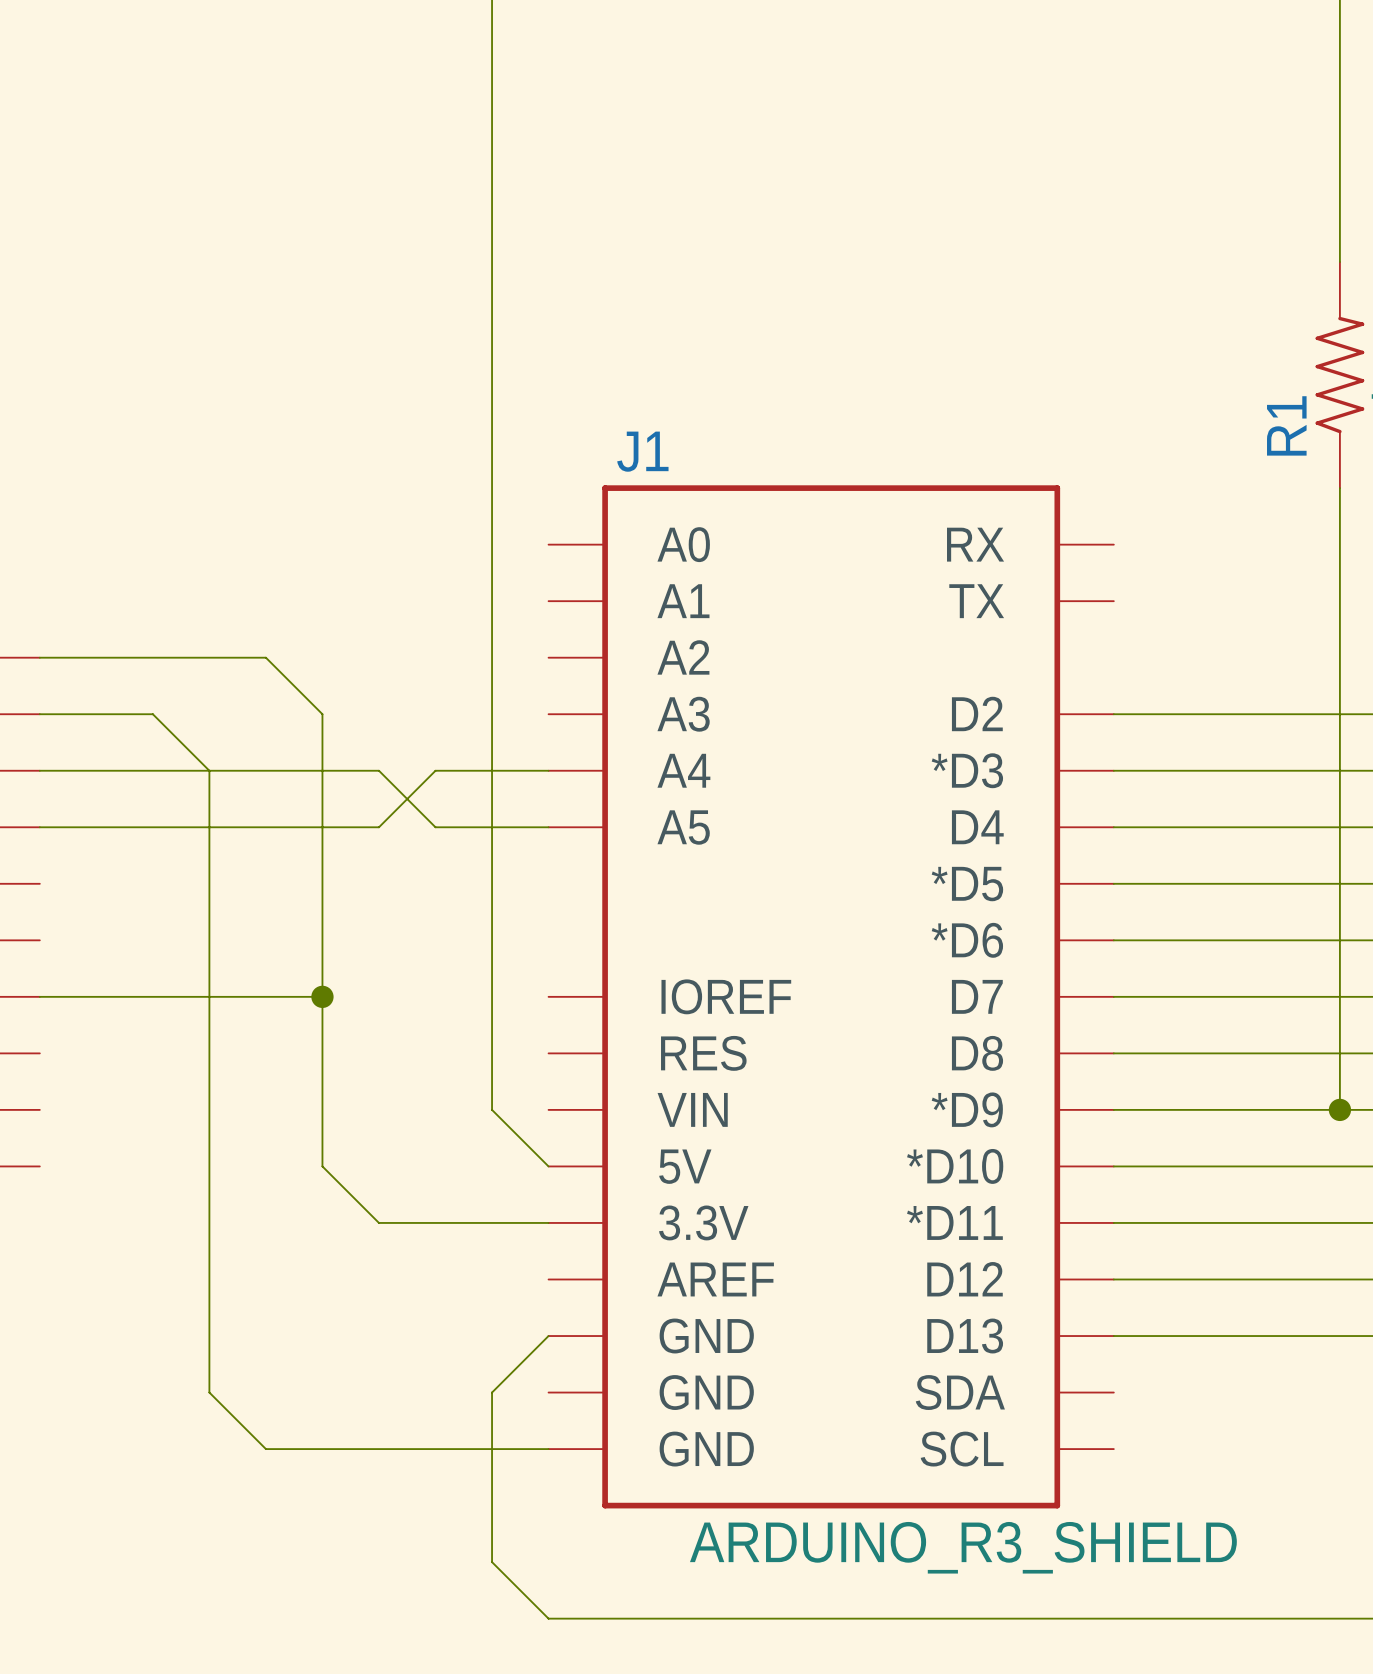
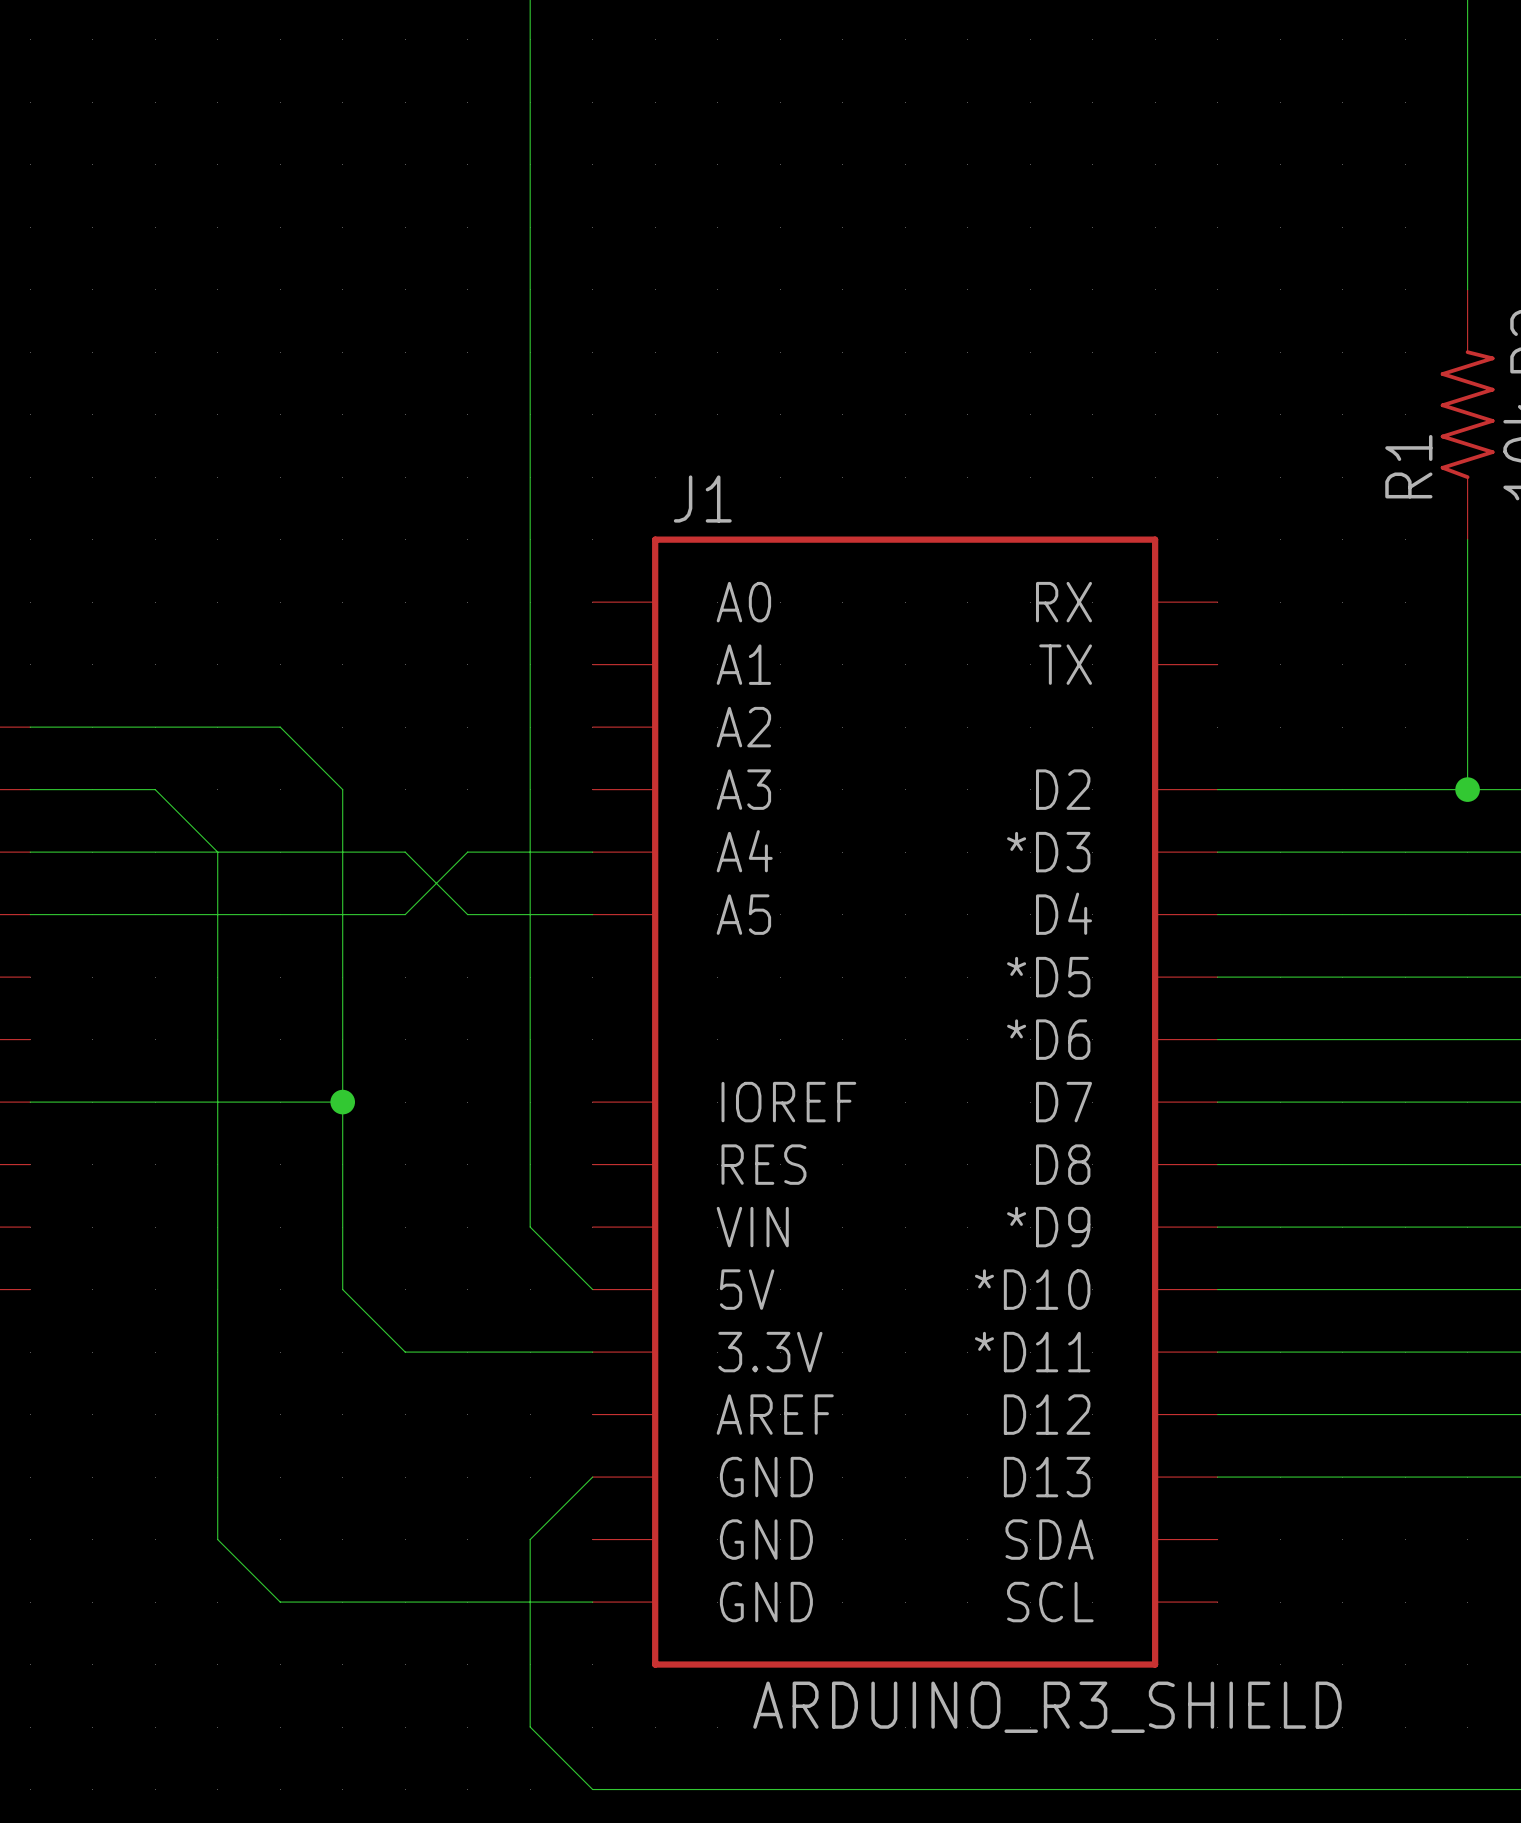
wire: (1339, 714) (1339, 1109) -> none
junction: none -> (1467, 789)
junction: (1339, 1109) -> none

